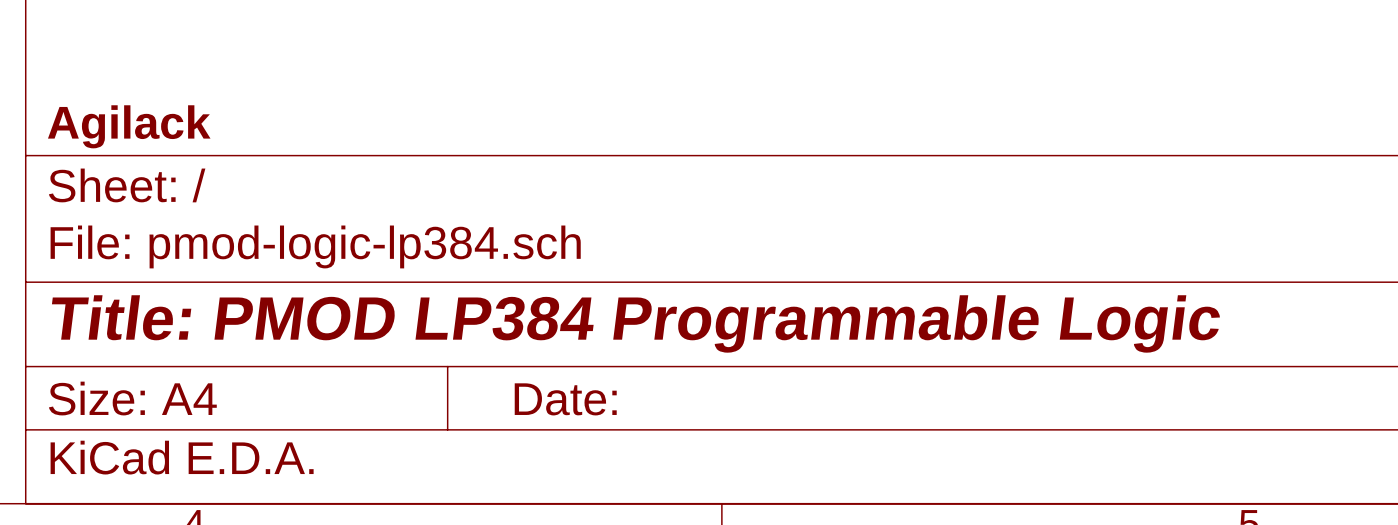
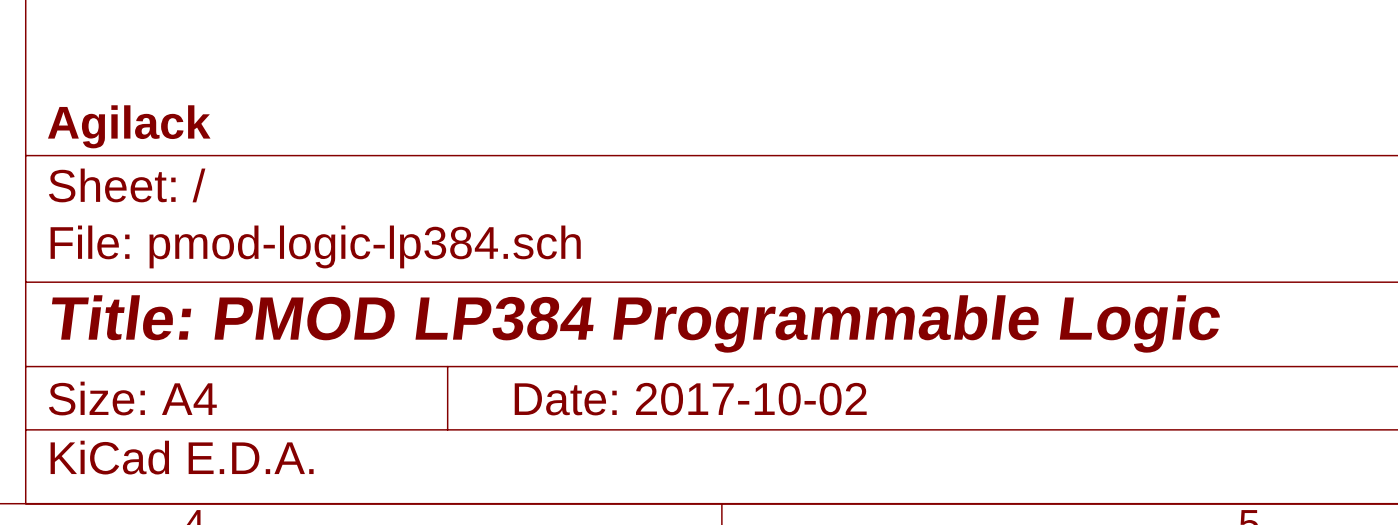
title block: Date: (565, 399) -> Date: 2017-10-02 (690, 399)

